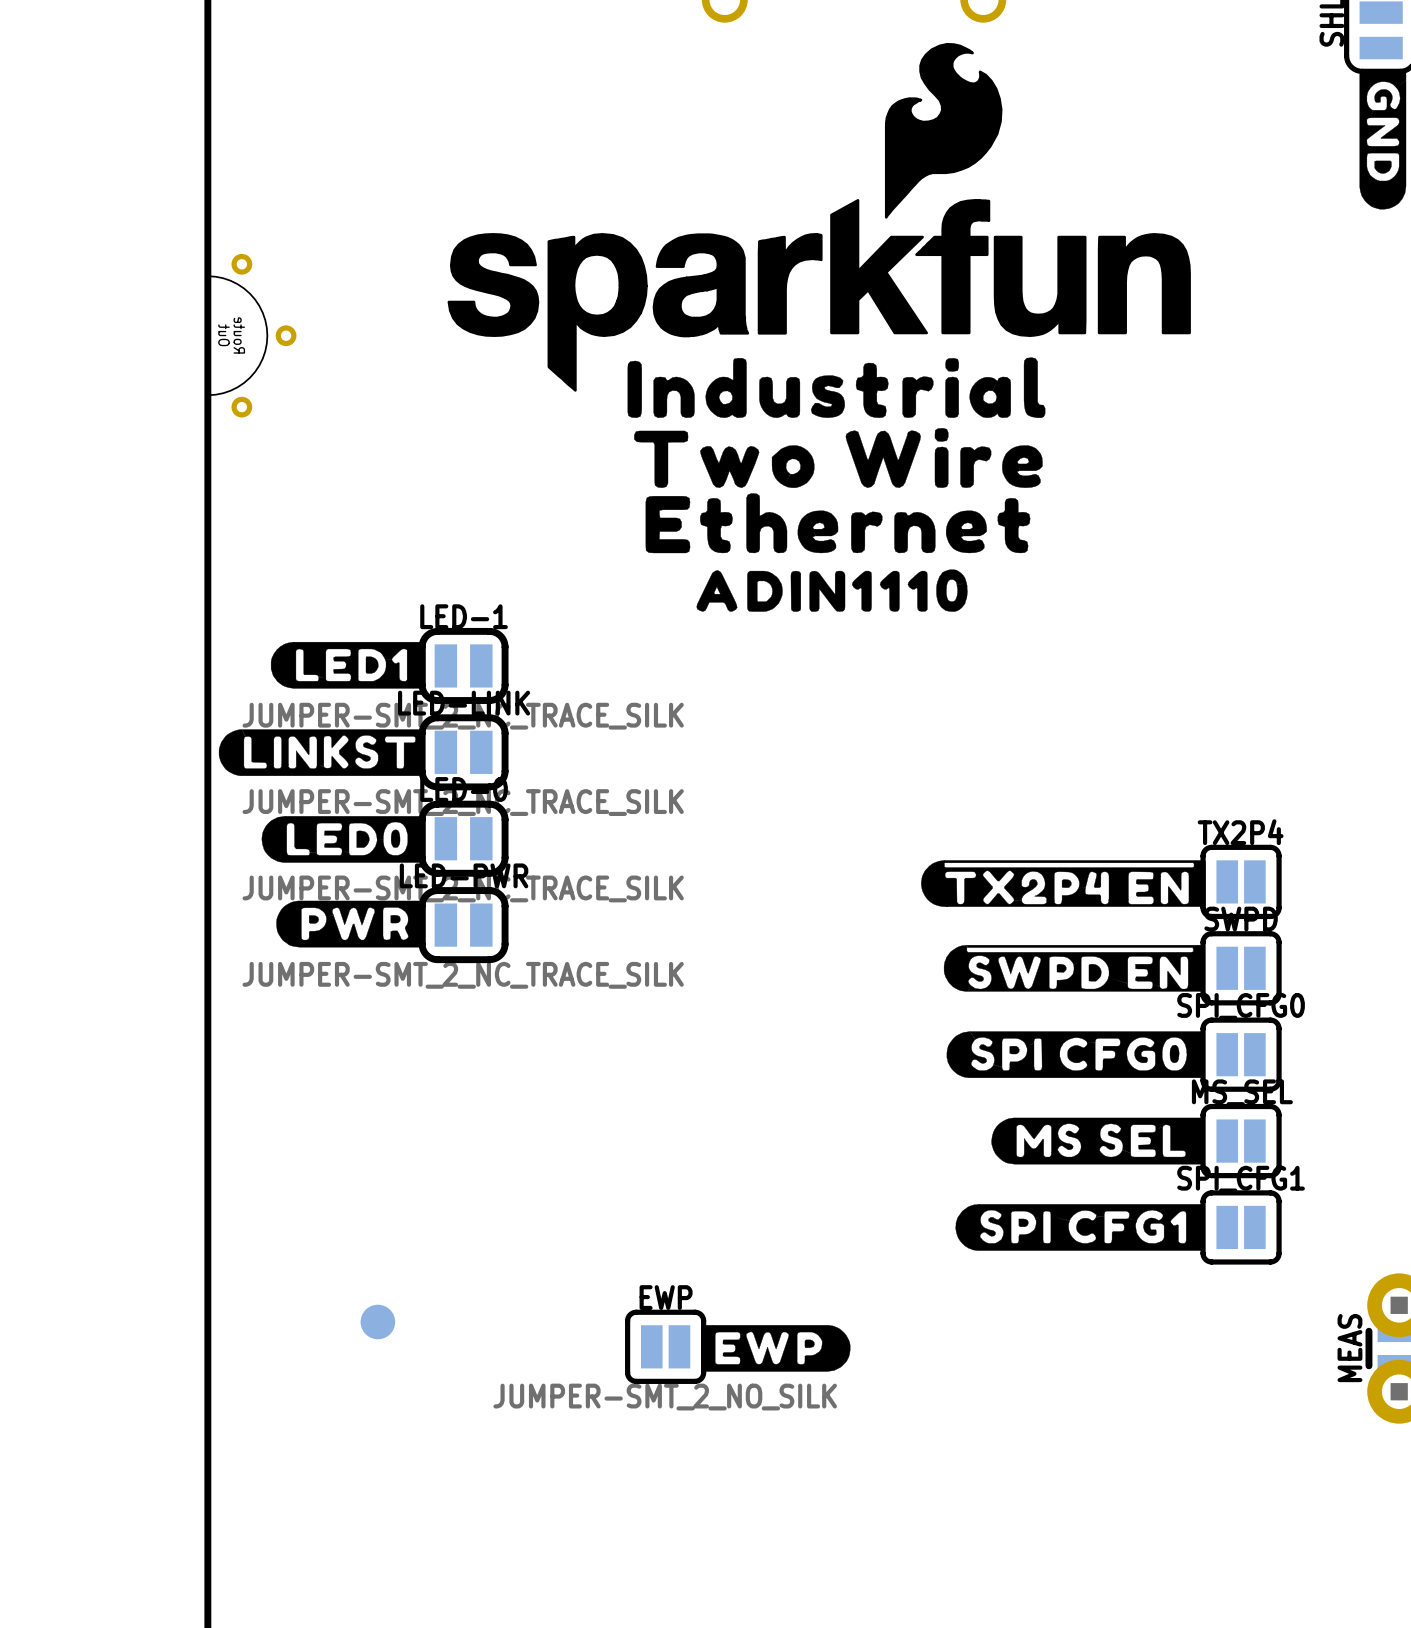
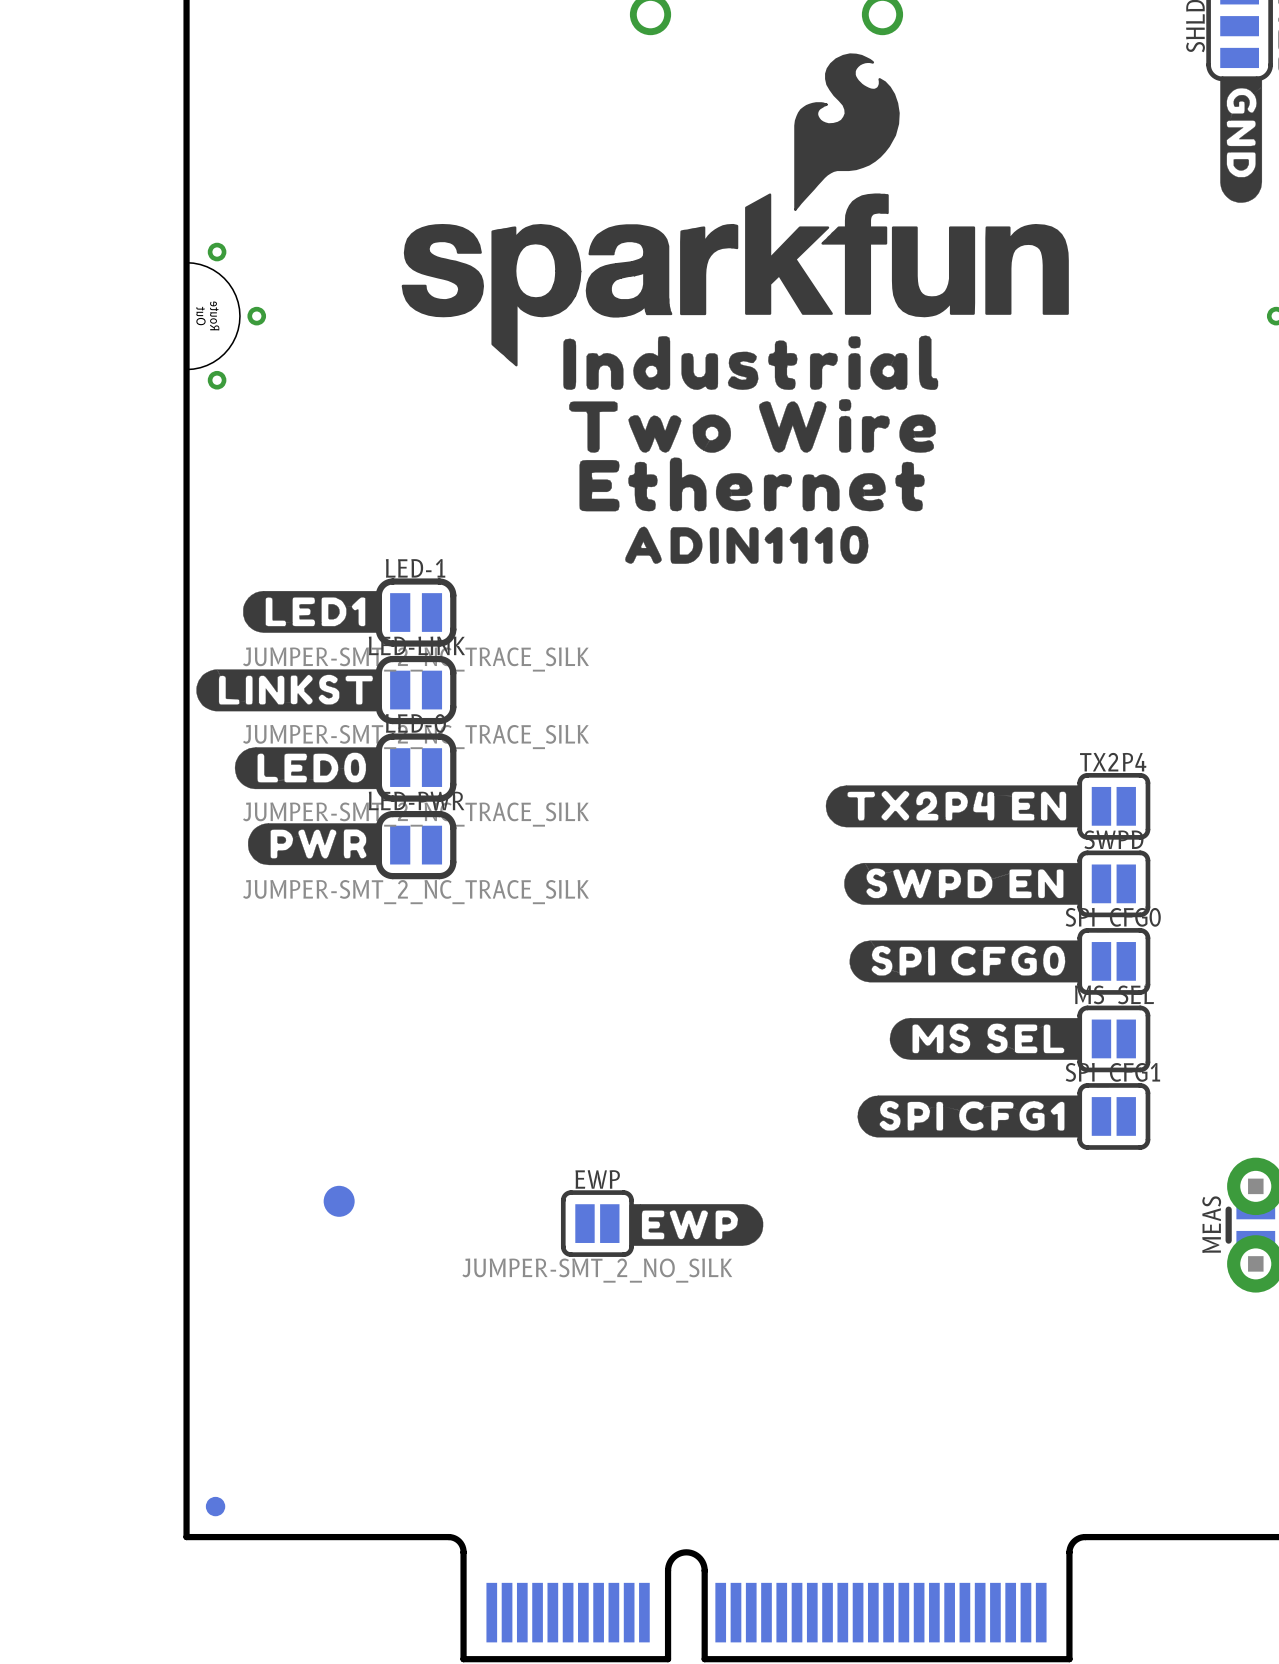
drawing shape: [921, 860, 1206, 907] -> [825, 785, 1082, 828]
drawing shape: [943, 945, 1205, 992] -> [844, 862, 1079, 905]

